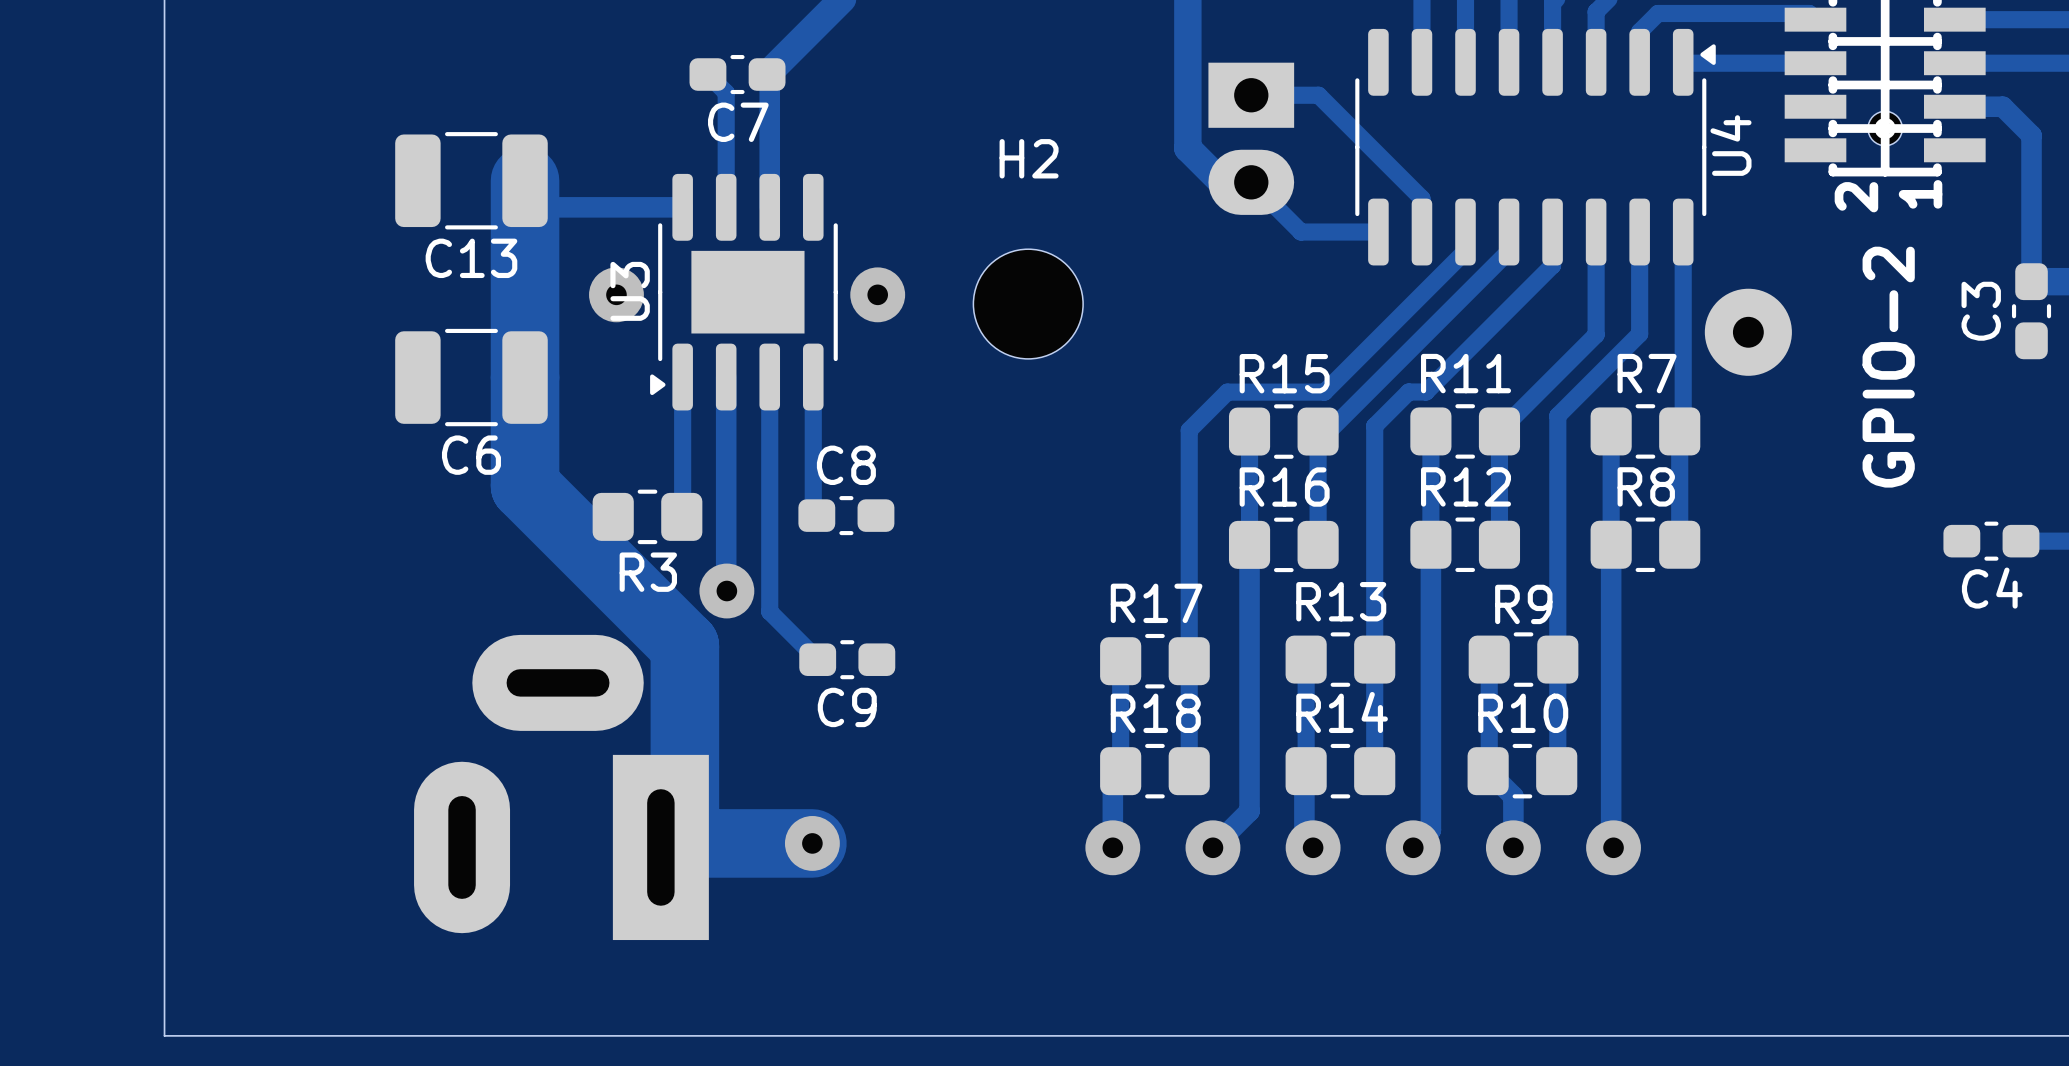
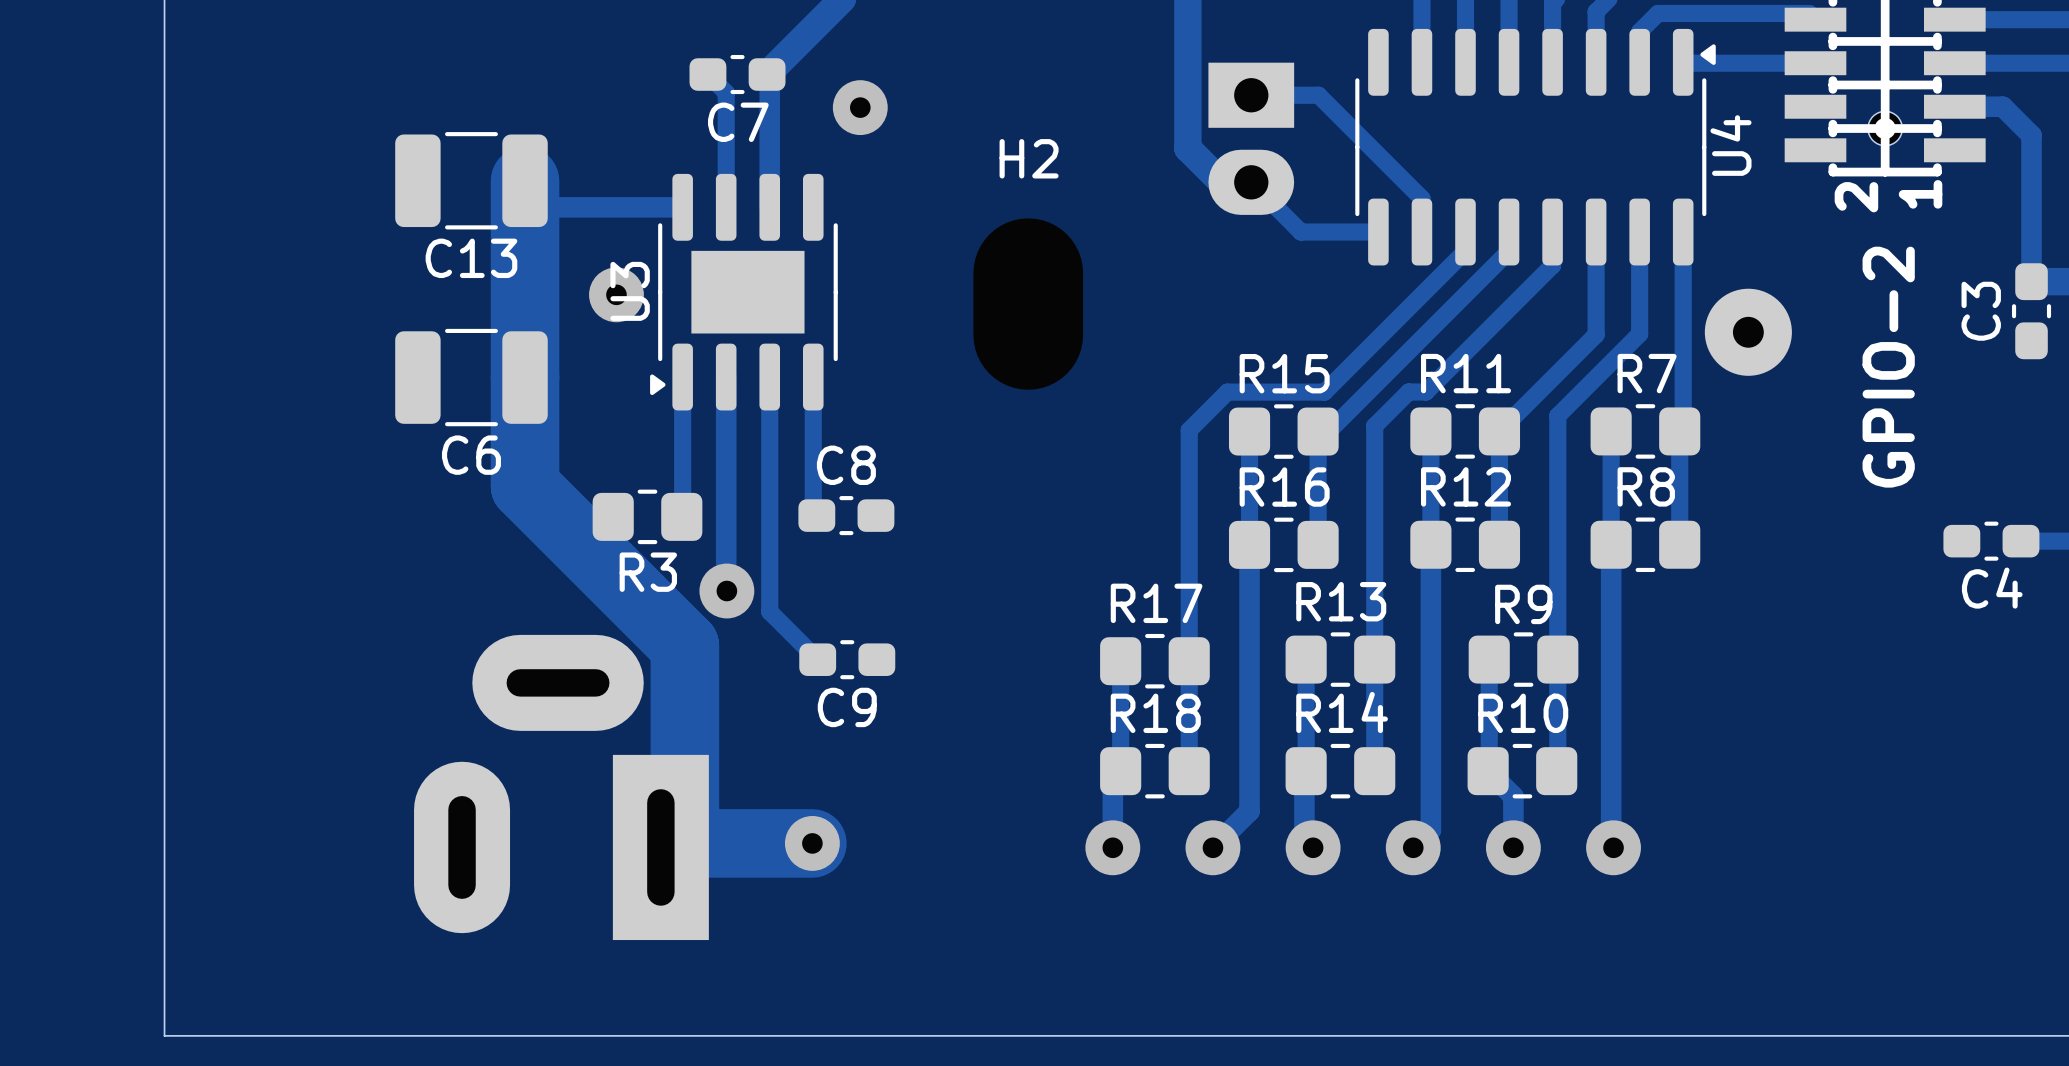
H2 footprint: [973, 249, 1084, 359] -> [973, 218, 1084, 390]
via position: (877, 294) -> (860, 107)

